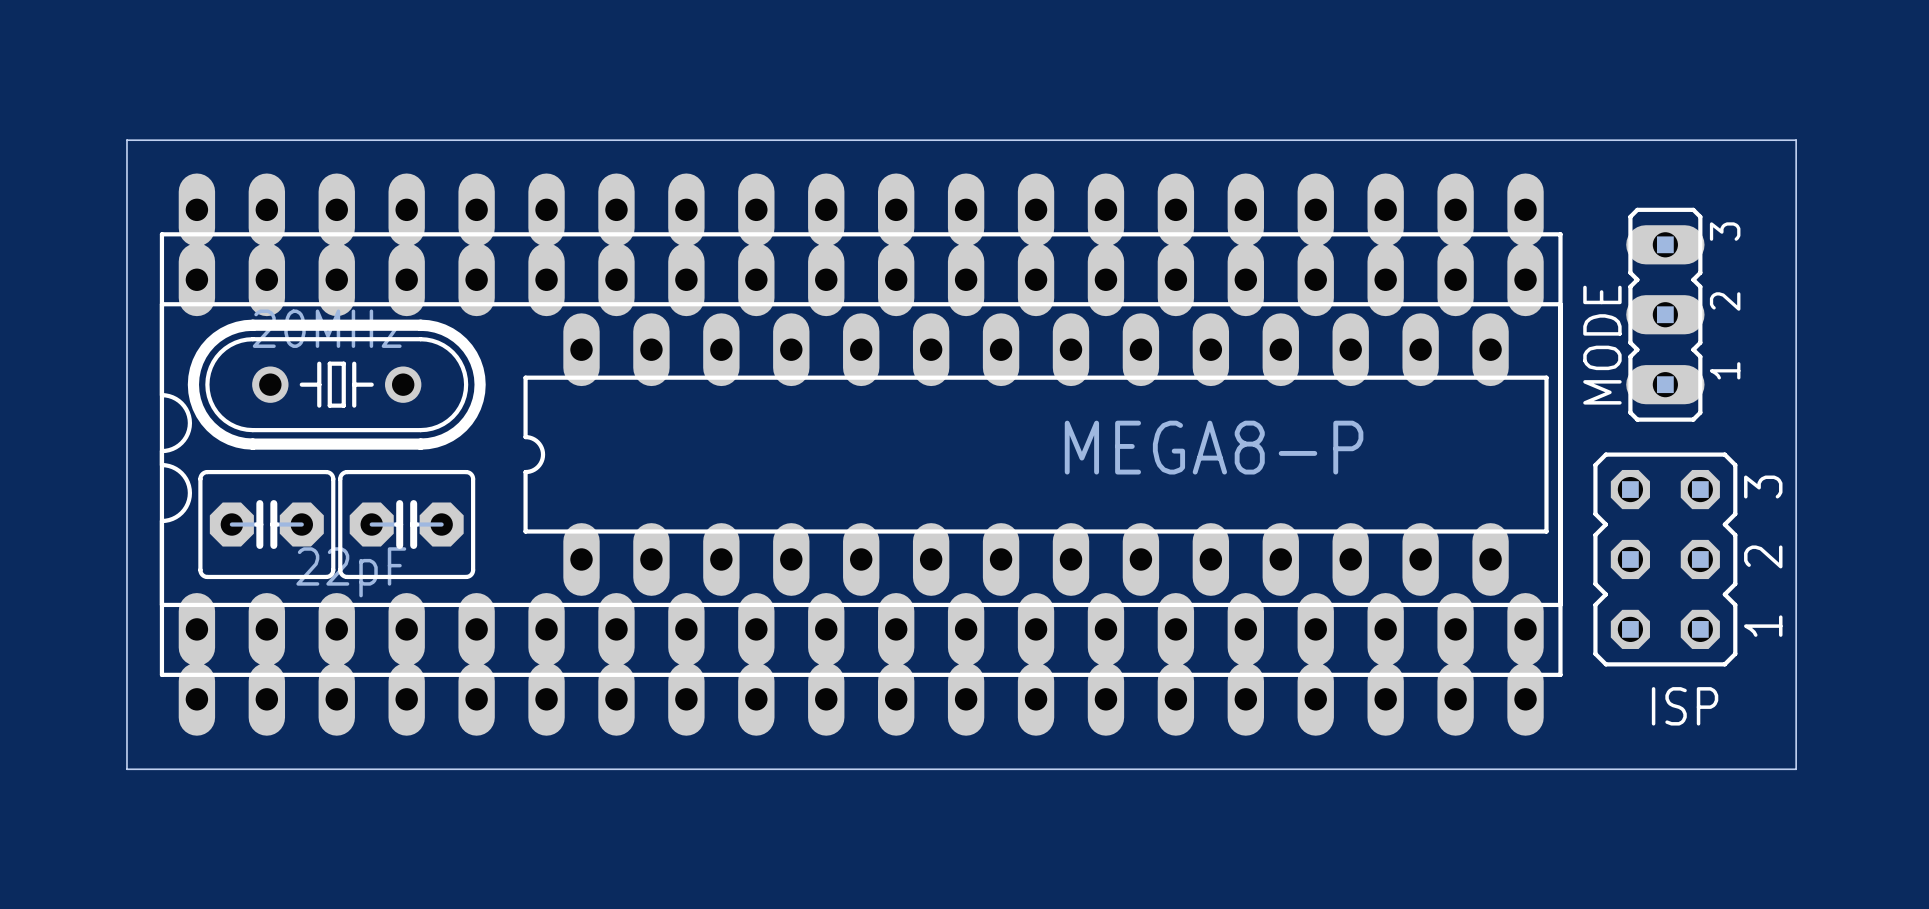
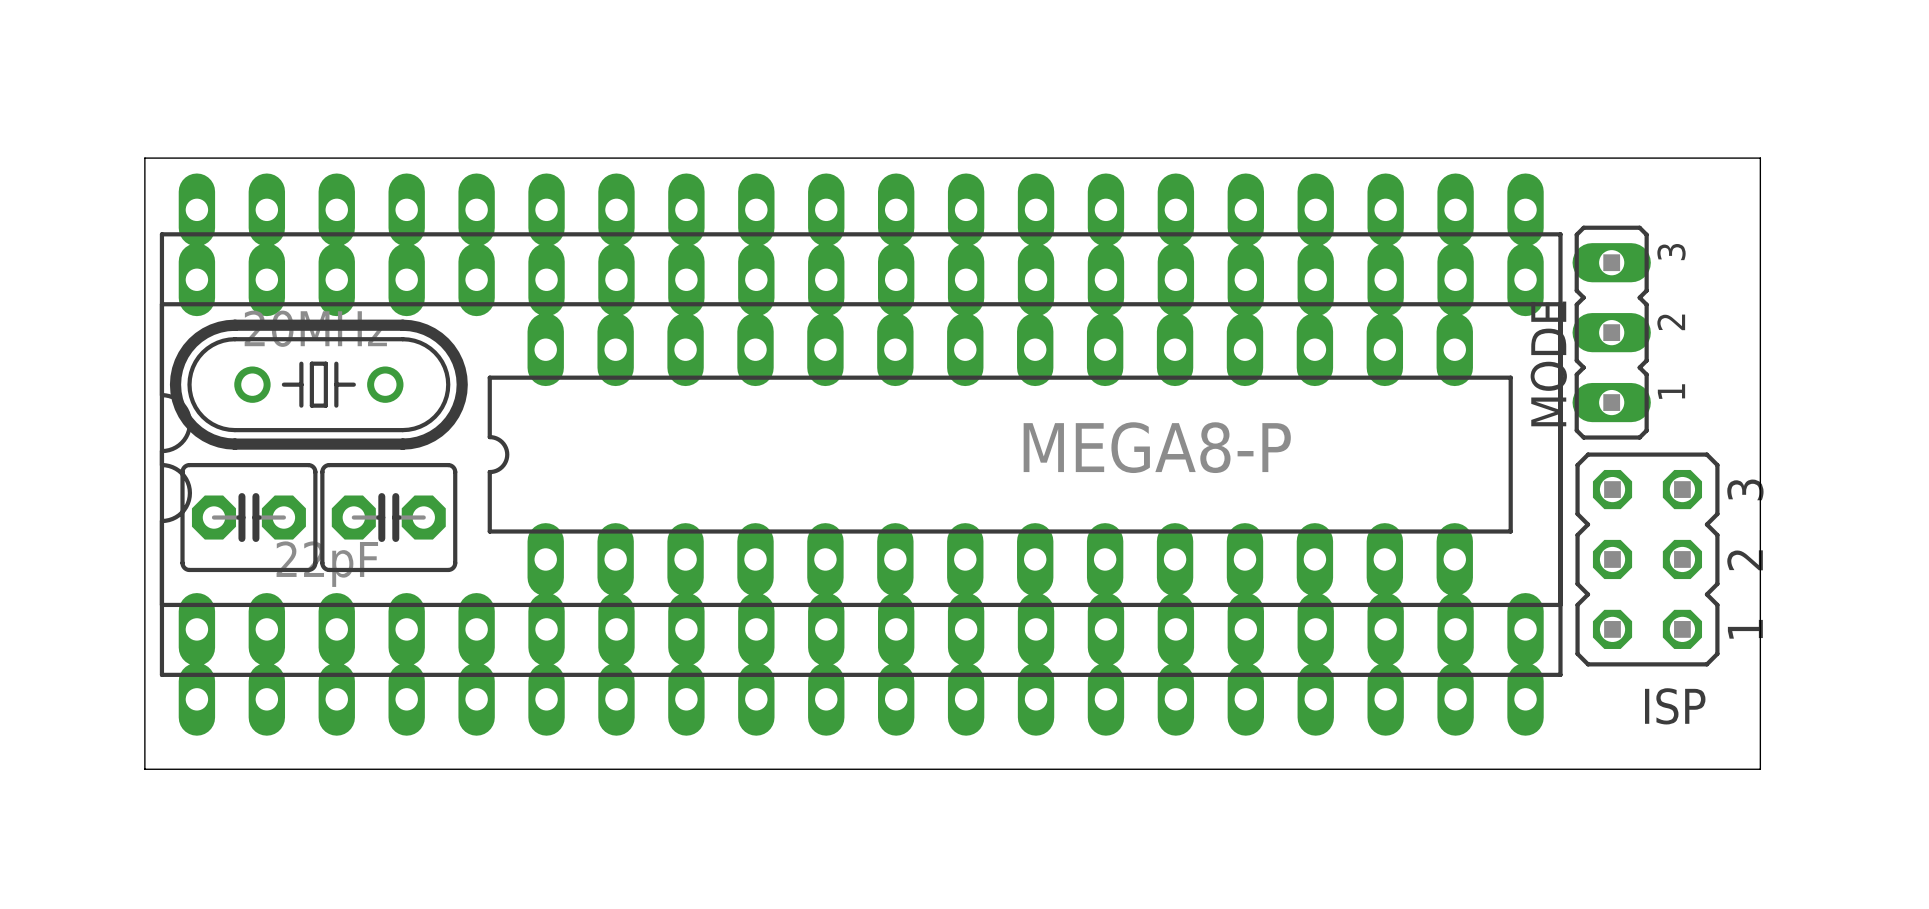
MODE position: (1665, 314) -> (1611, 332)
part position: (336, 384) -> (318, 384)
part position: (1036, 454) -> (1000, 454)
part position: (266, 524) -> (248, 517)
part position: (406, 524) -> (388, 517)
ISP position: (1665, 559) -> (1647, 559)
board edge: (144, 769) (126, 769) (126, 140) (1796, 140) (1796, 769) (1760, 769) -> (144, 769) (144, 158) (1760, 158) (1760, 769)

